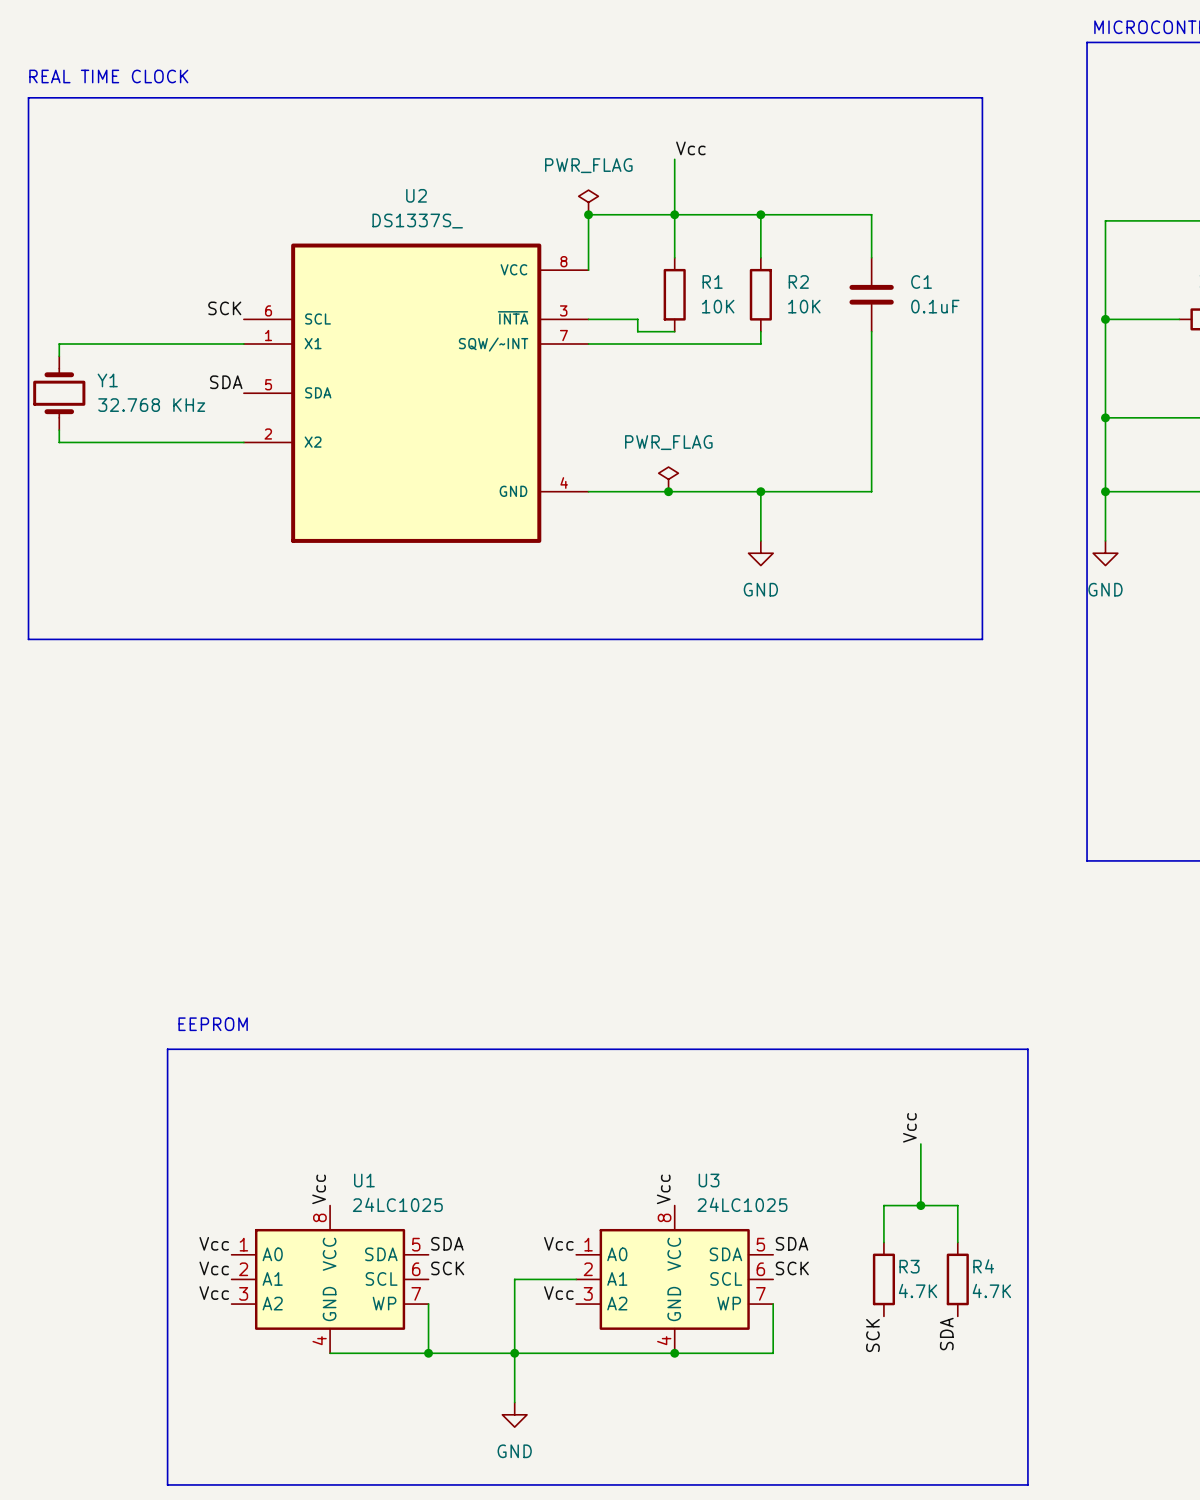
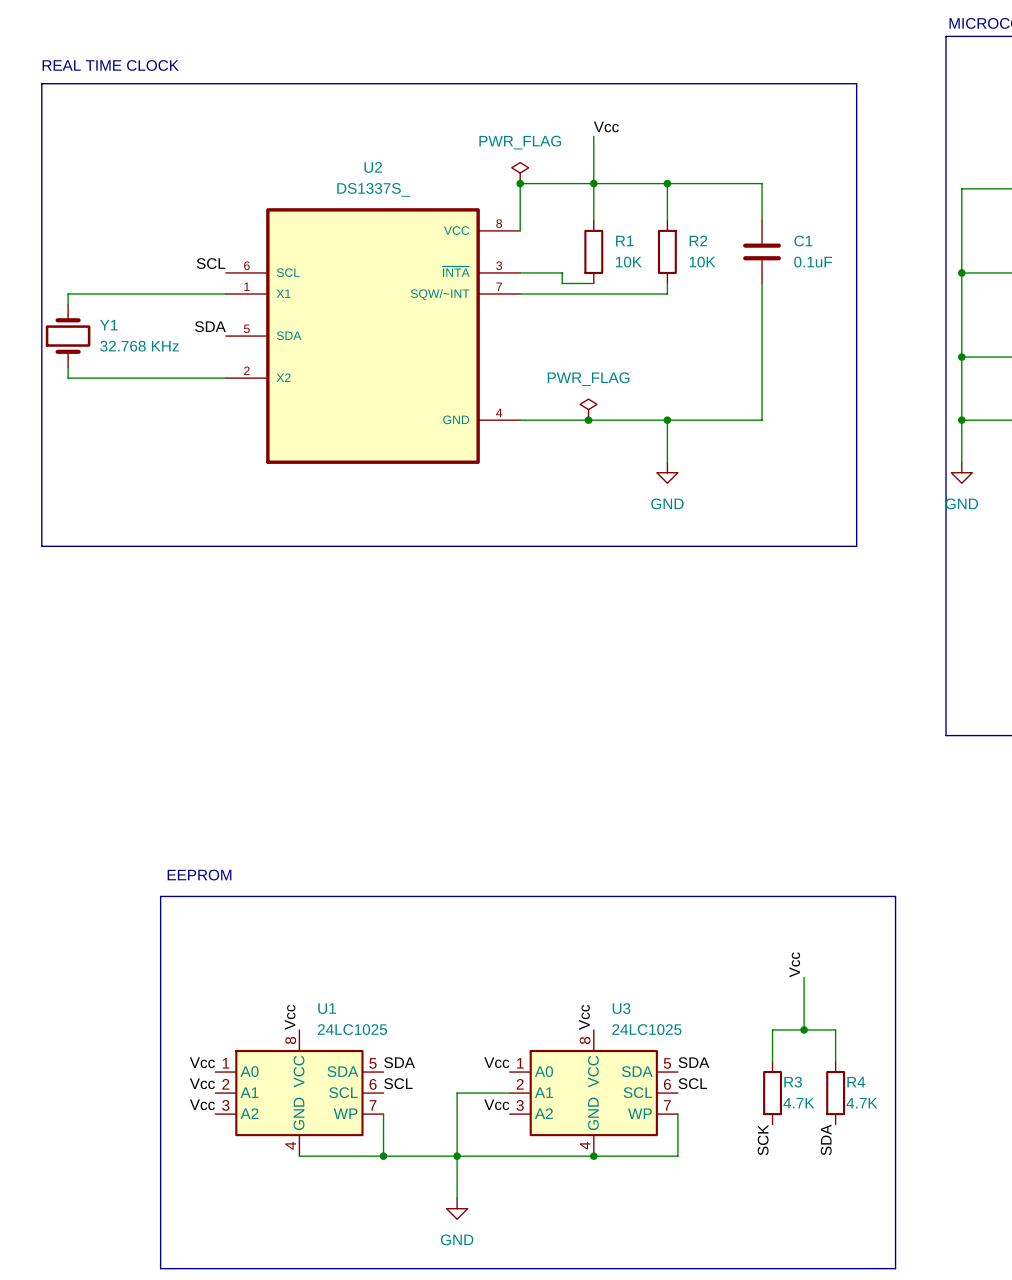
label: SCK (224, 308) -> SCL (211, 263)
label: SCK (447, 1268) -> SCL (398, 1083)
label: SCK (792, 1268) -> SCL (692, 1083)

